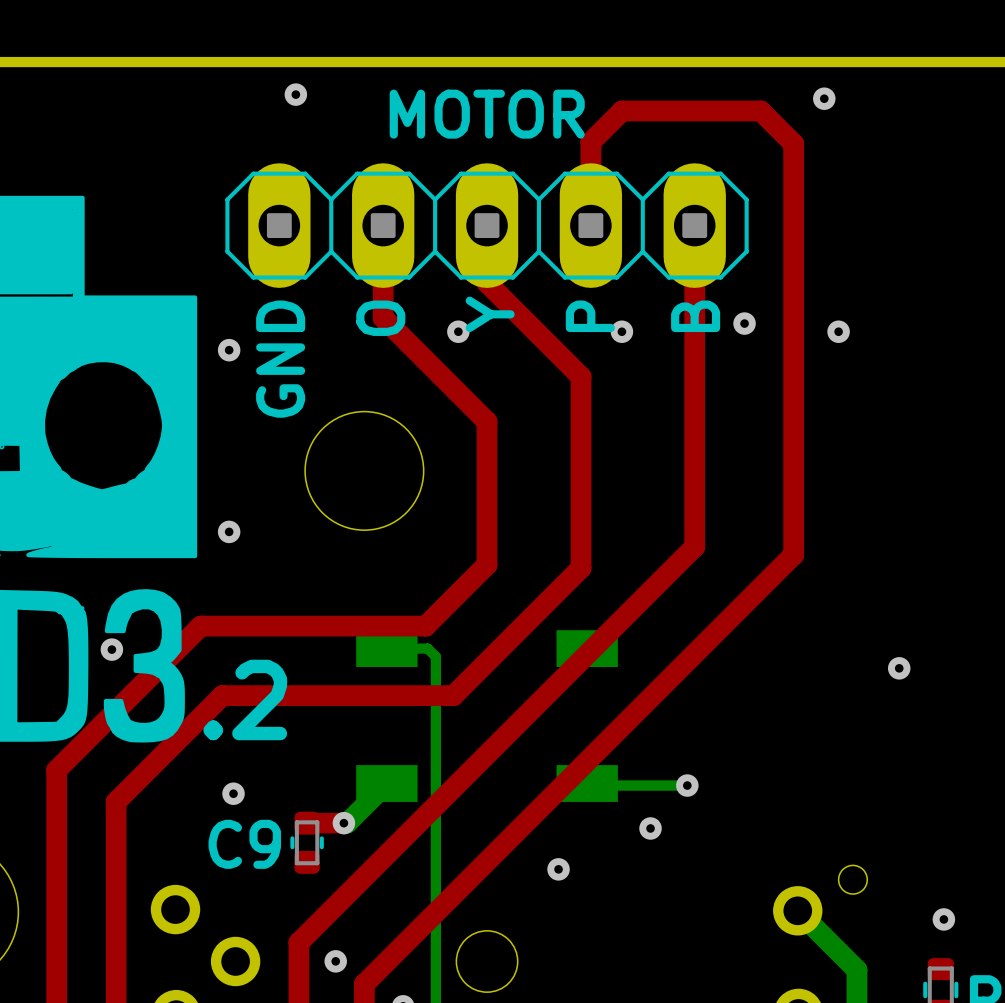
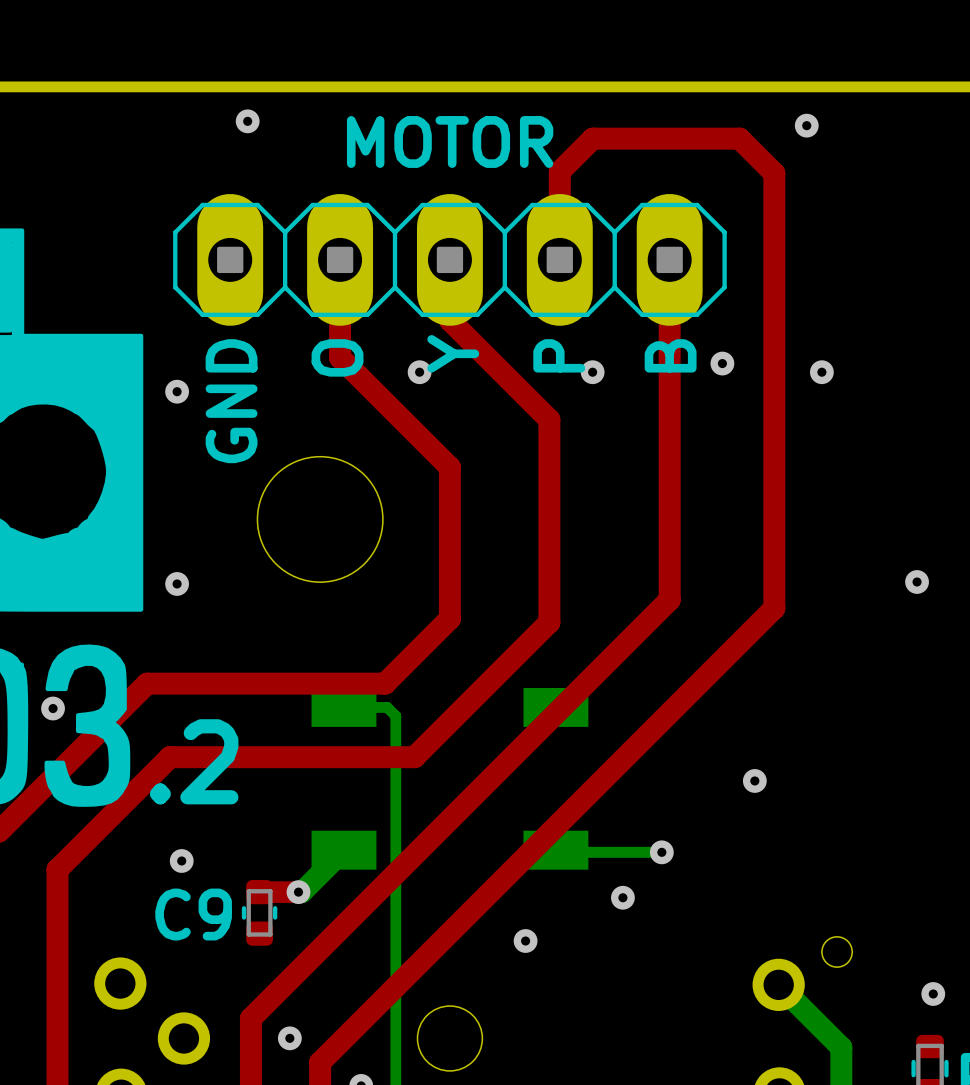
via: none -> (917, 581)
via: (899, 668) -> none
via: none -> (754, 780)

